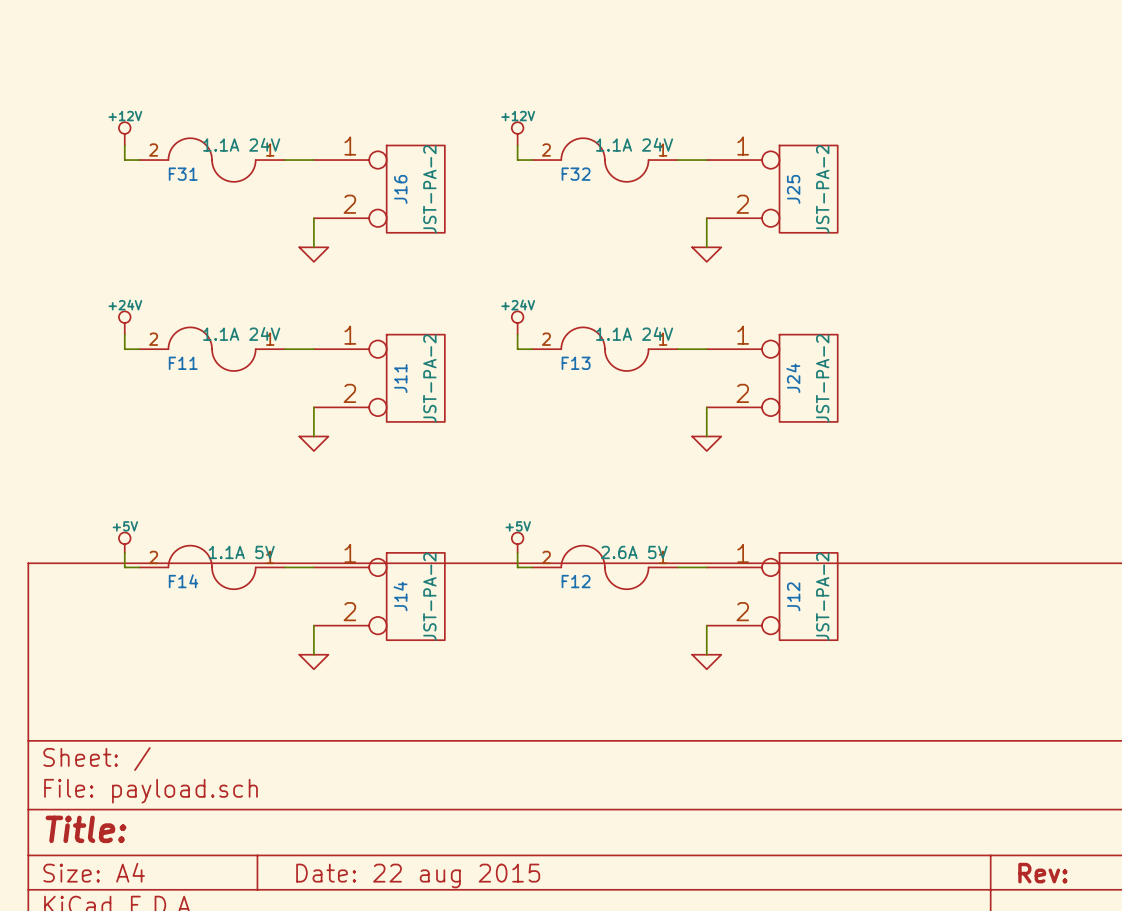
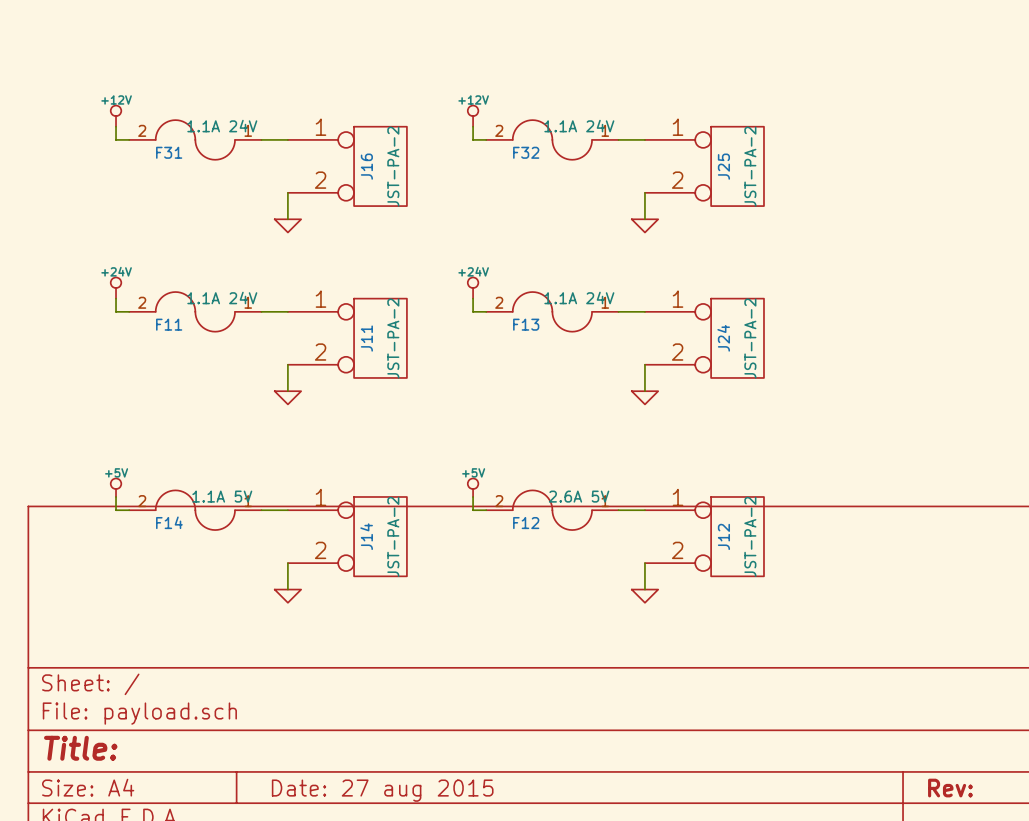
title block: Date: 22 aug 2015 (418, 875) -> Date: 27 aug 2015 (382, 790)

